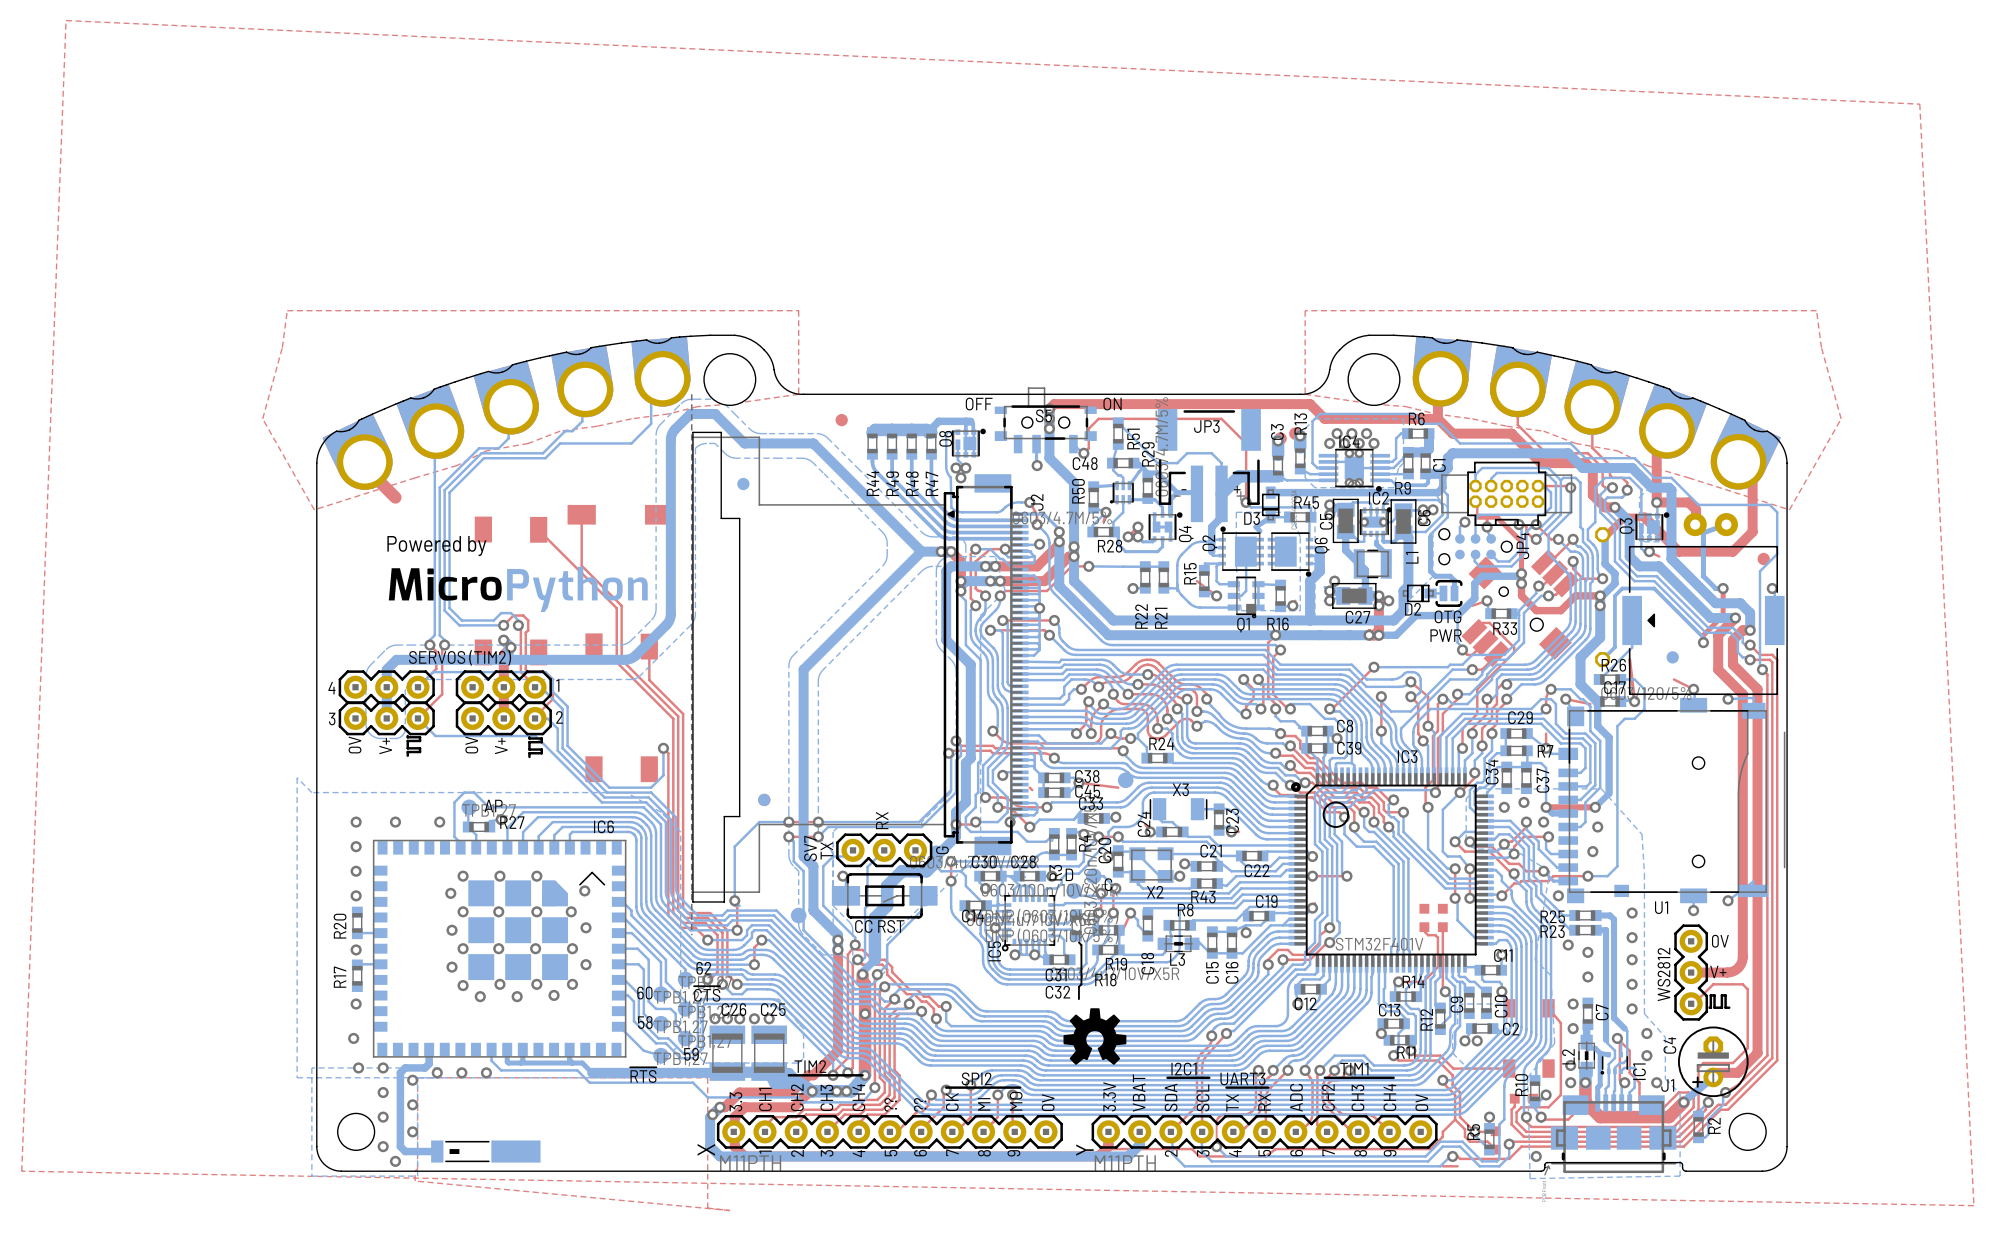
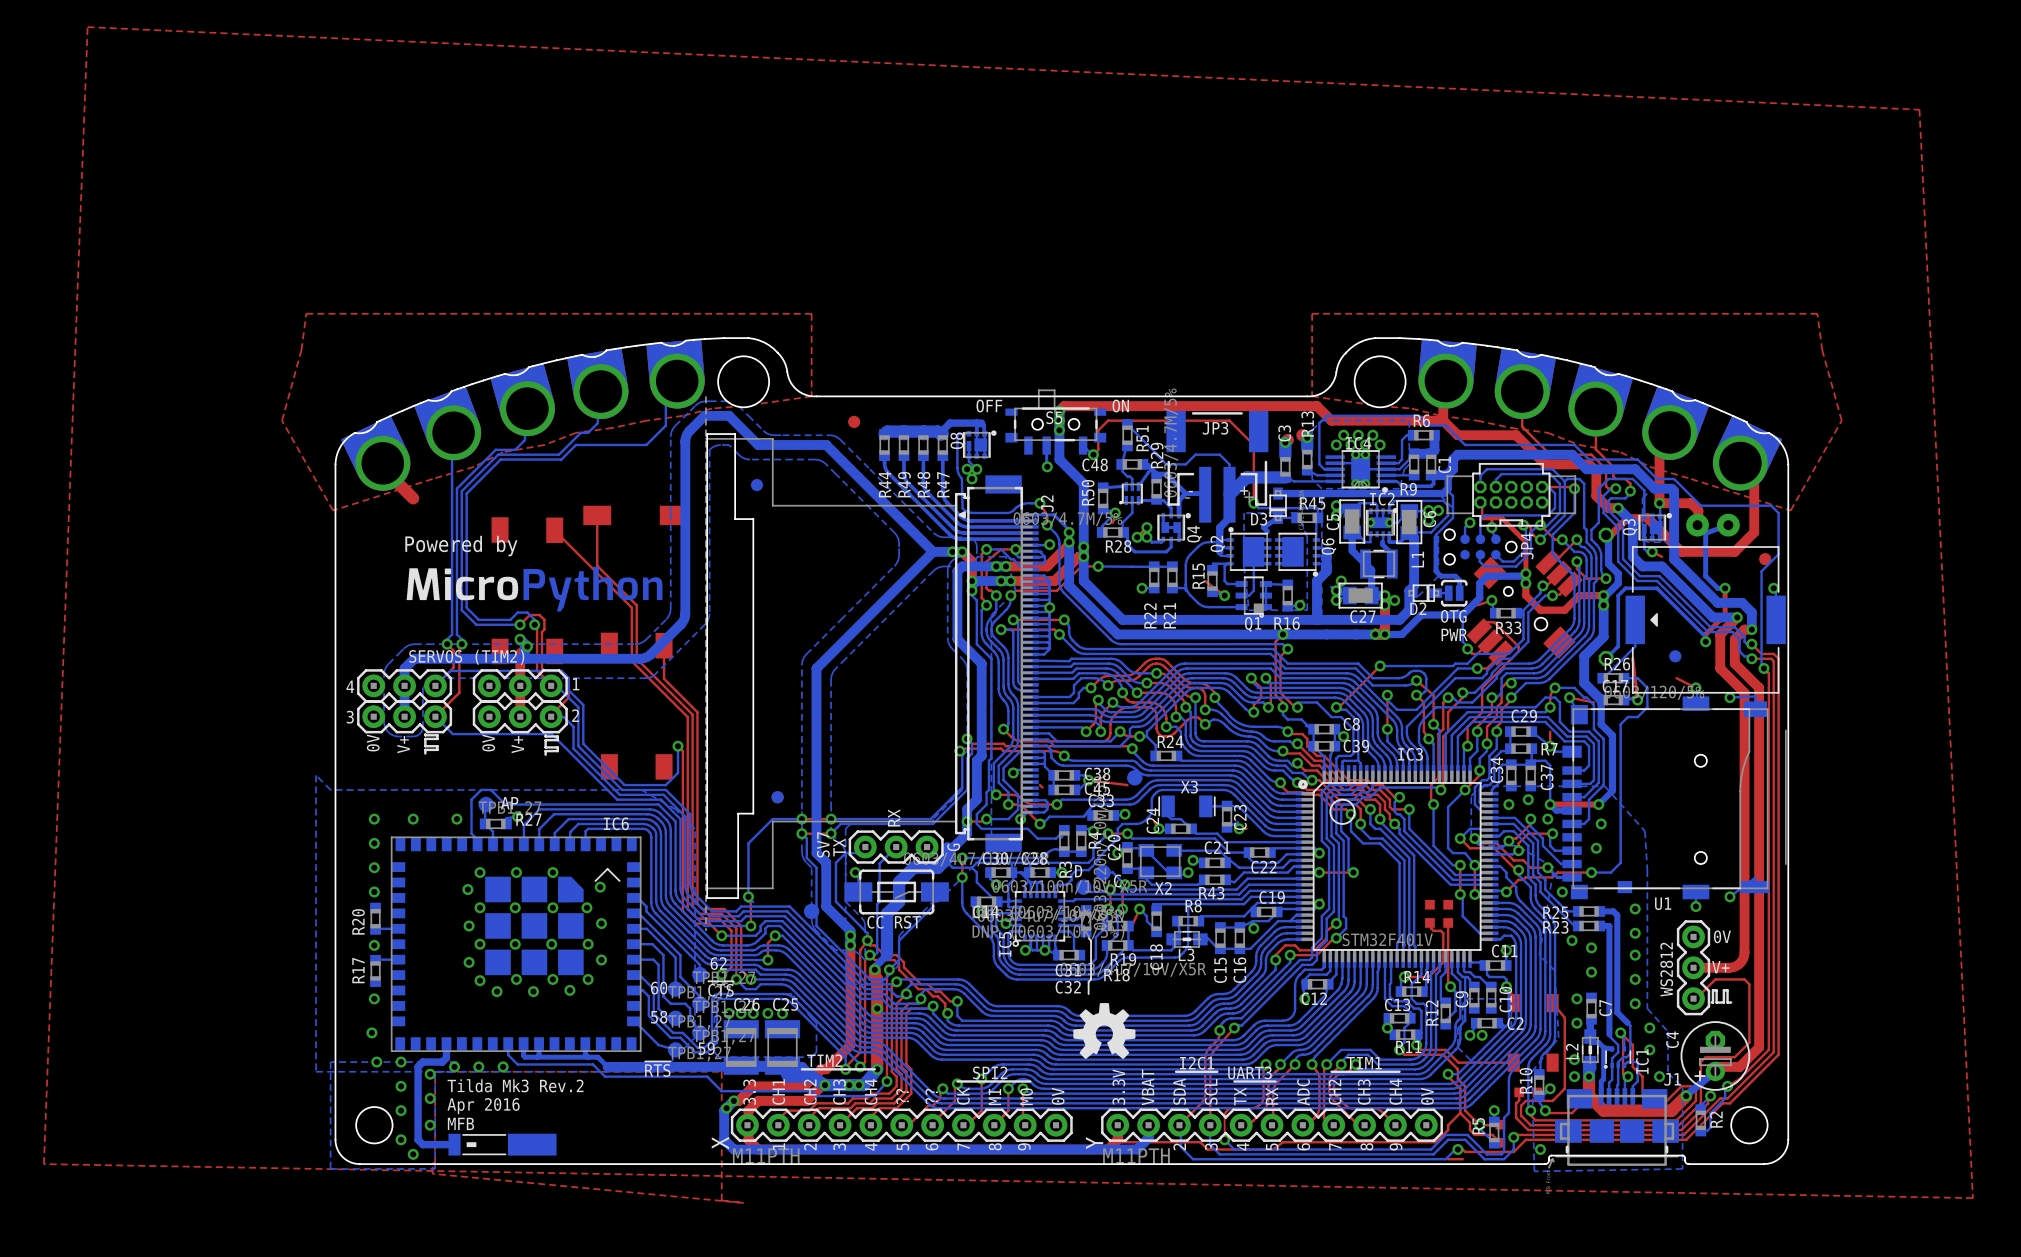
text: none -> Tilda Mk3 Rev.2 (515, 1085)
text: none -> Apr 2016 (483, 1106)
text: none -> MFB (460, 1123)

